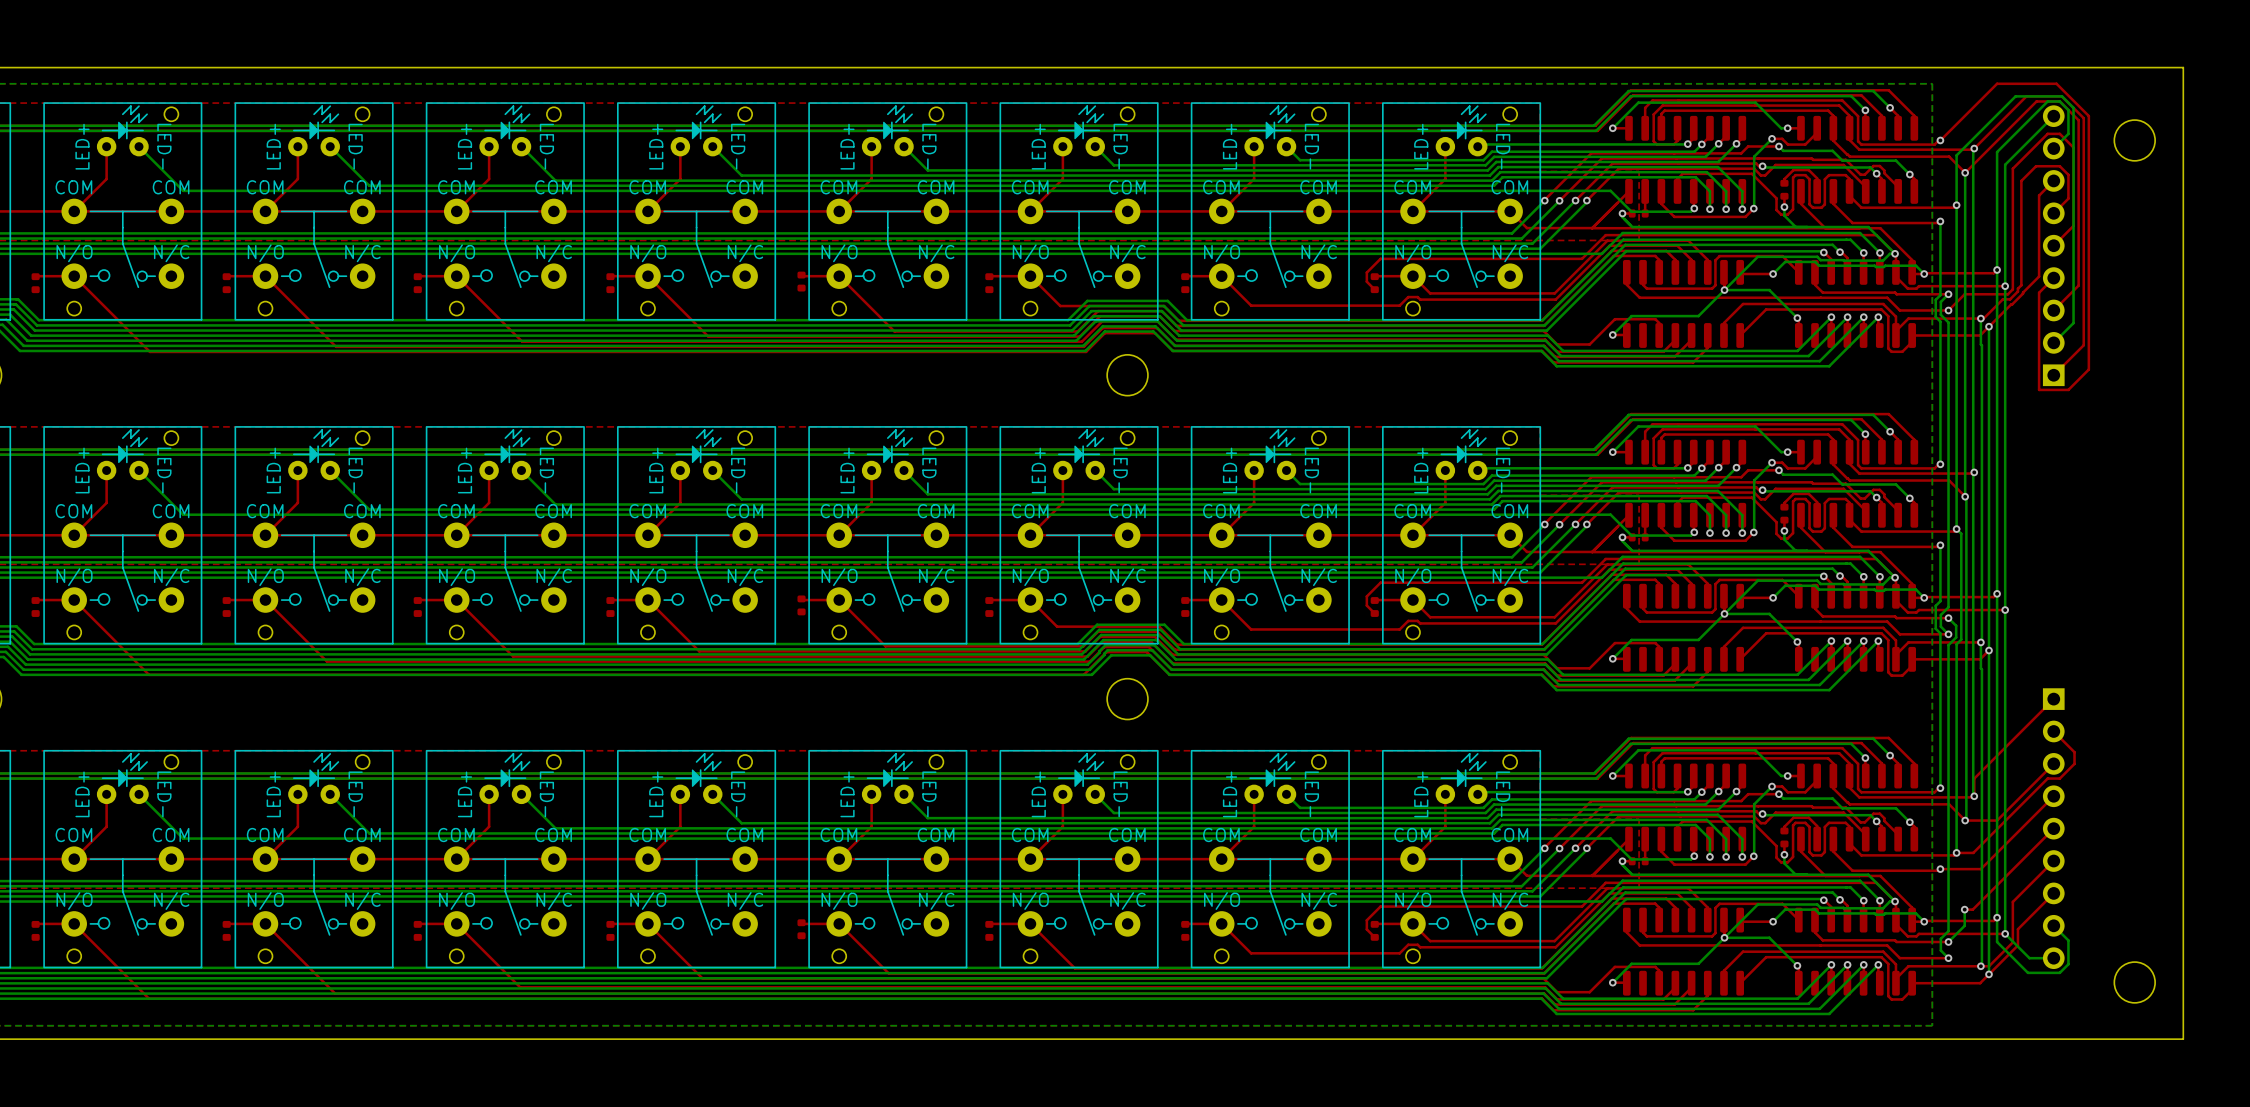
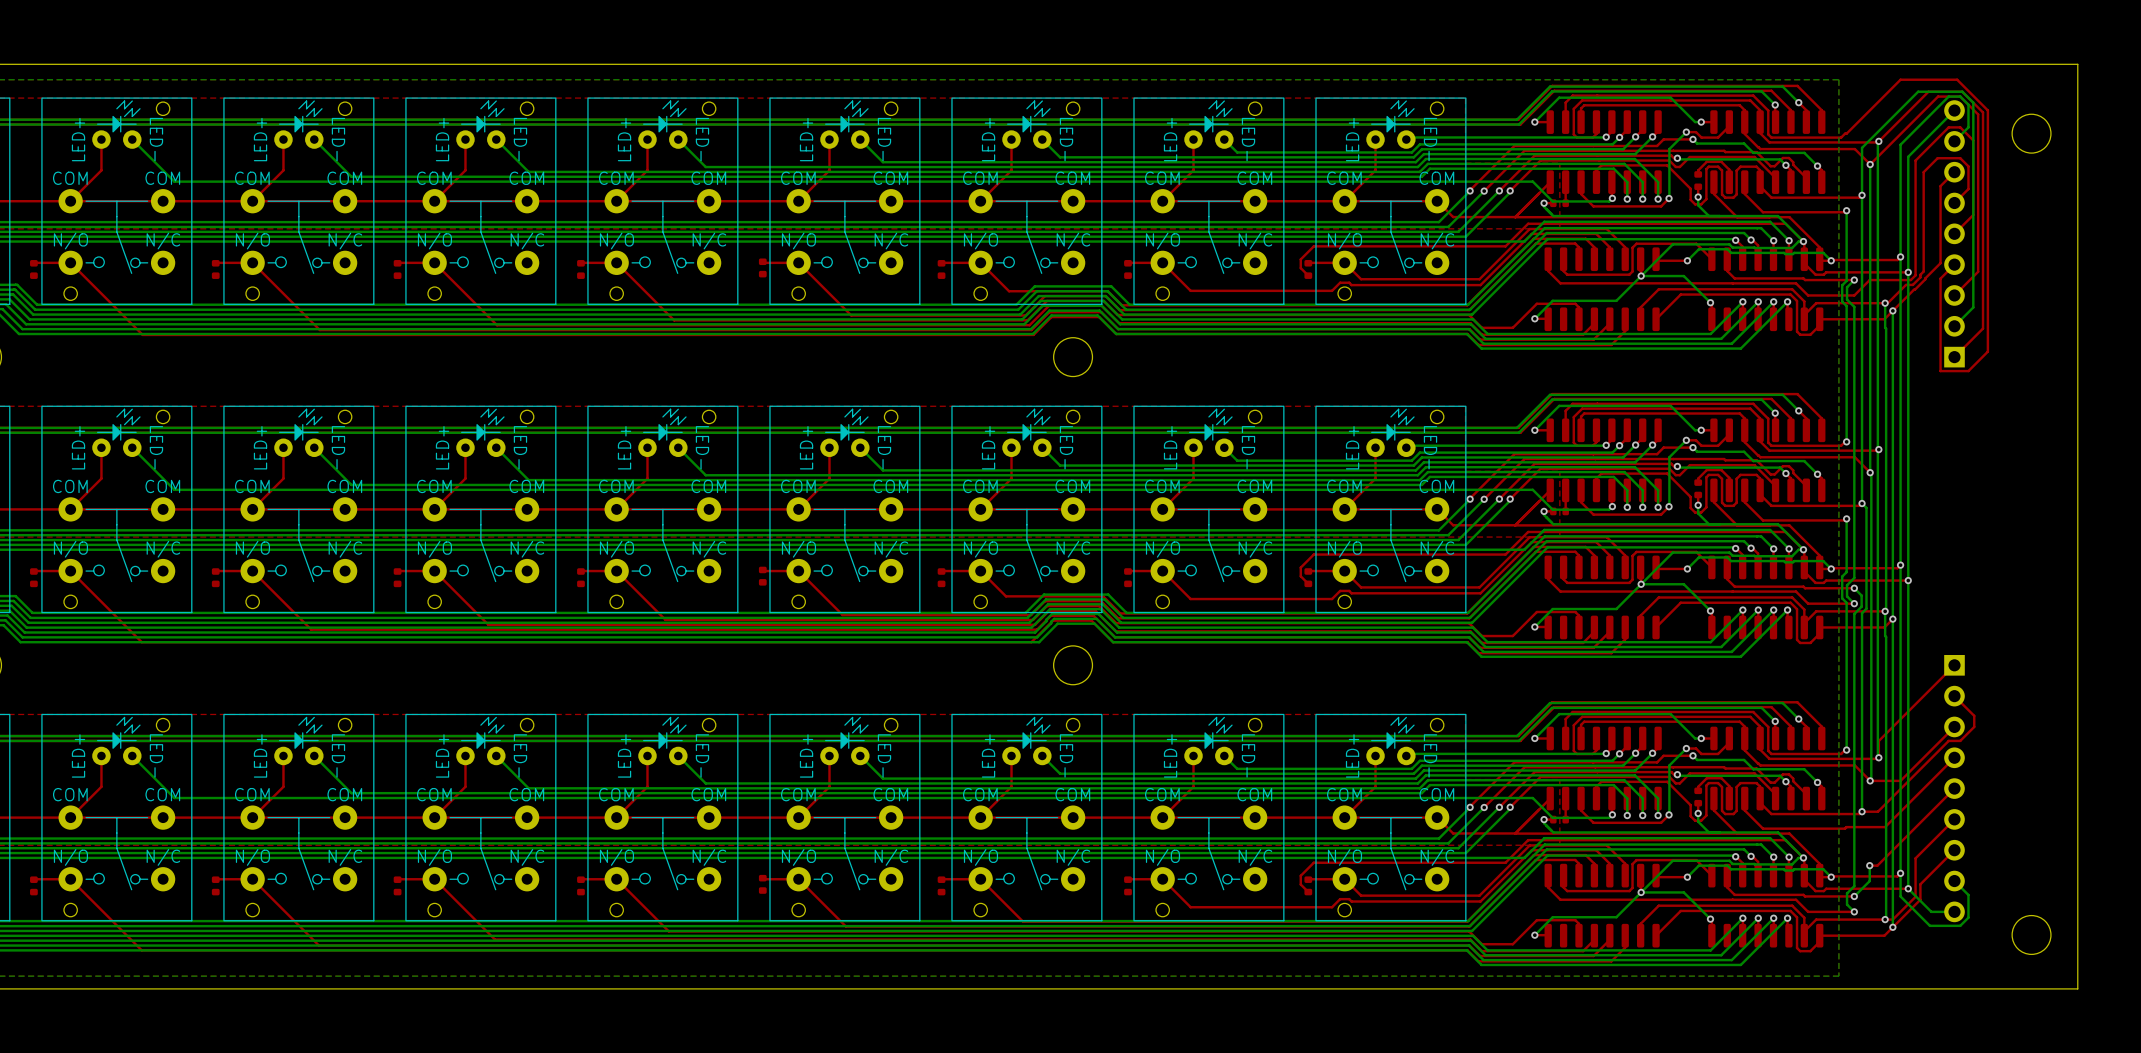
via: (1940, 140) -> none
via: (1948, 310) -> none
via: (1940, 869) -> none

